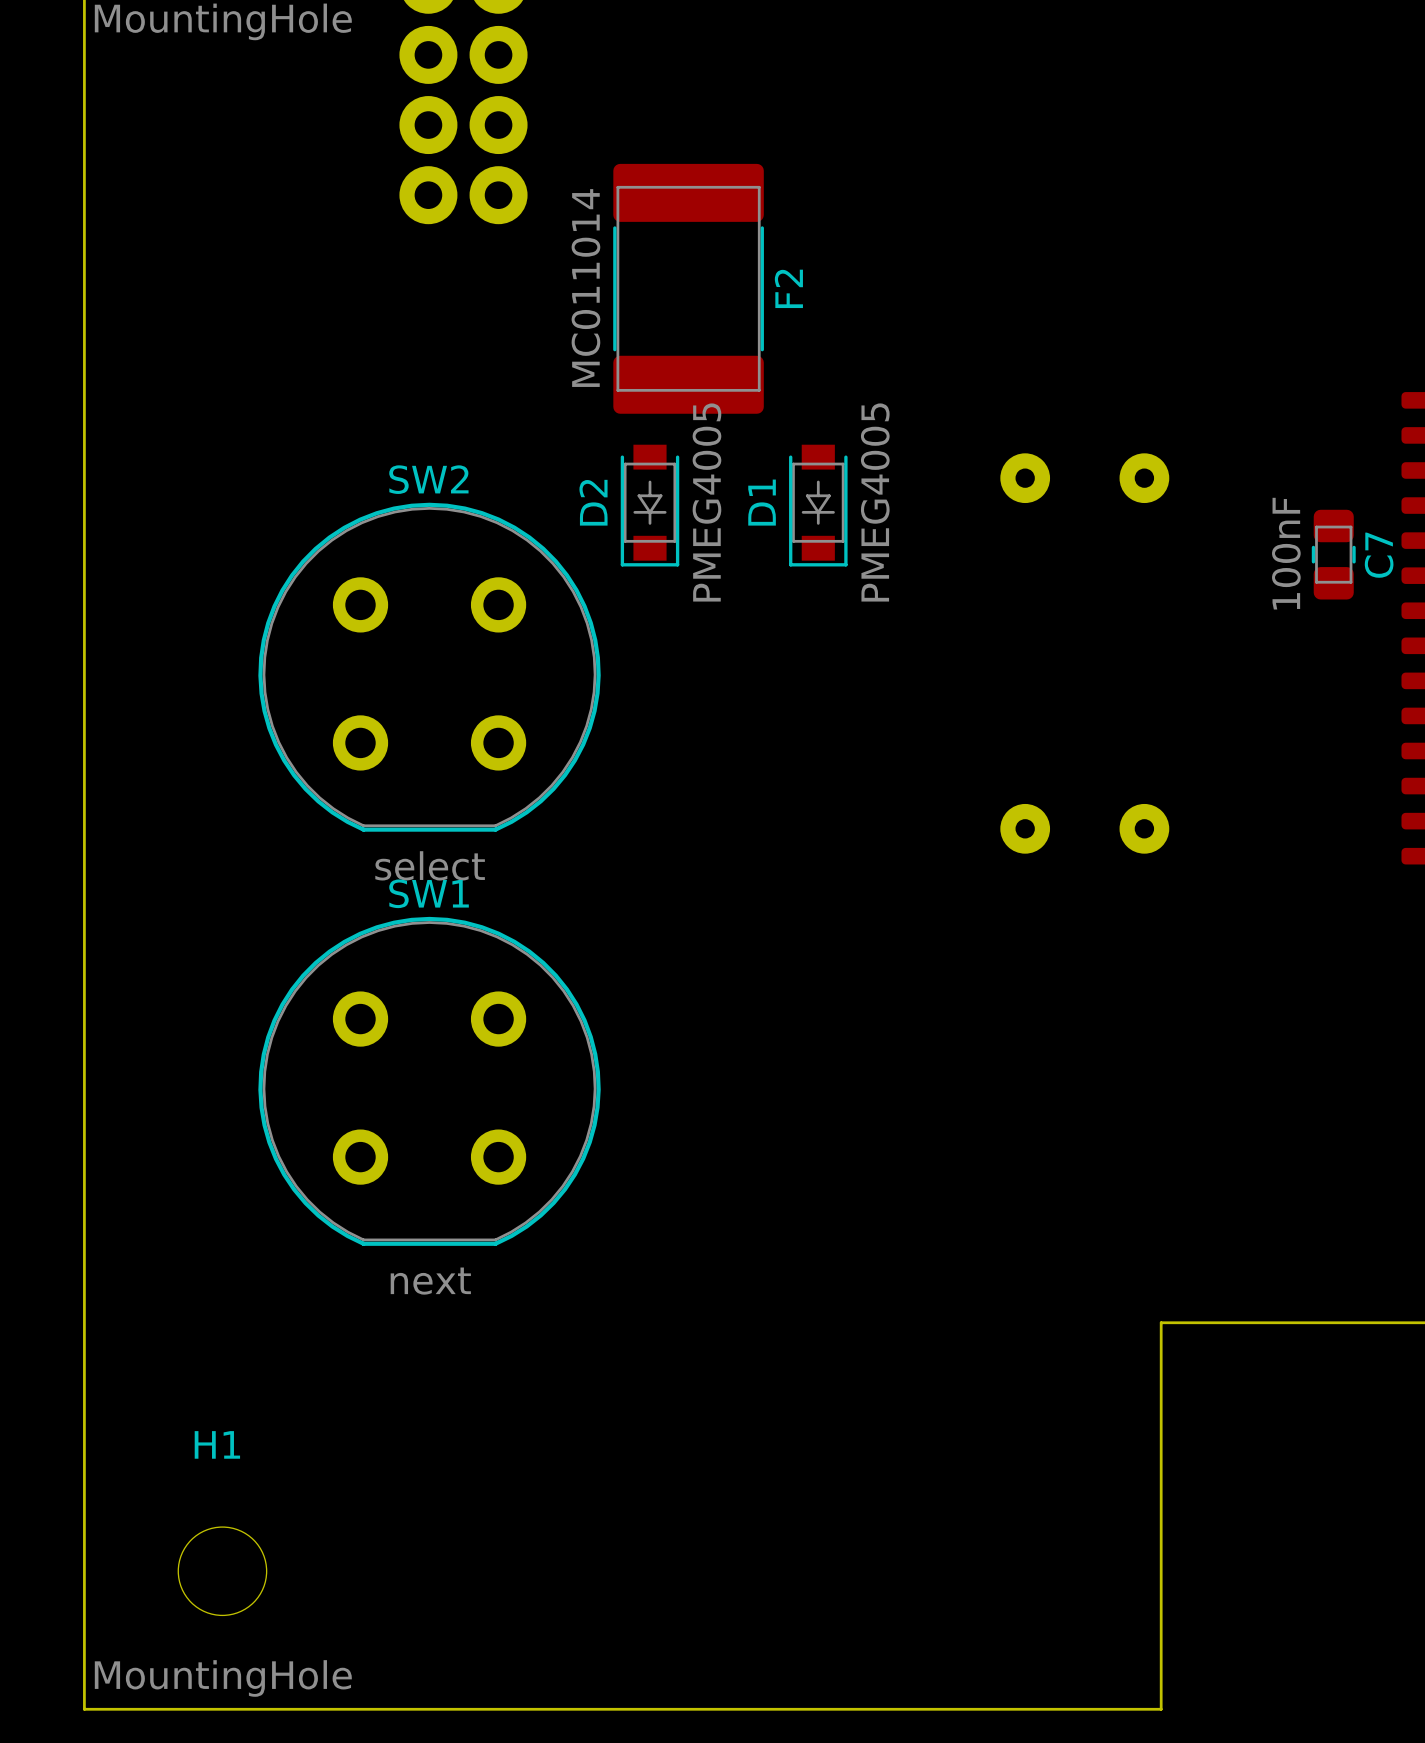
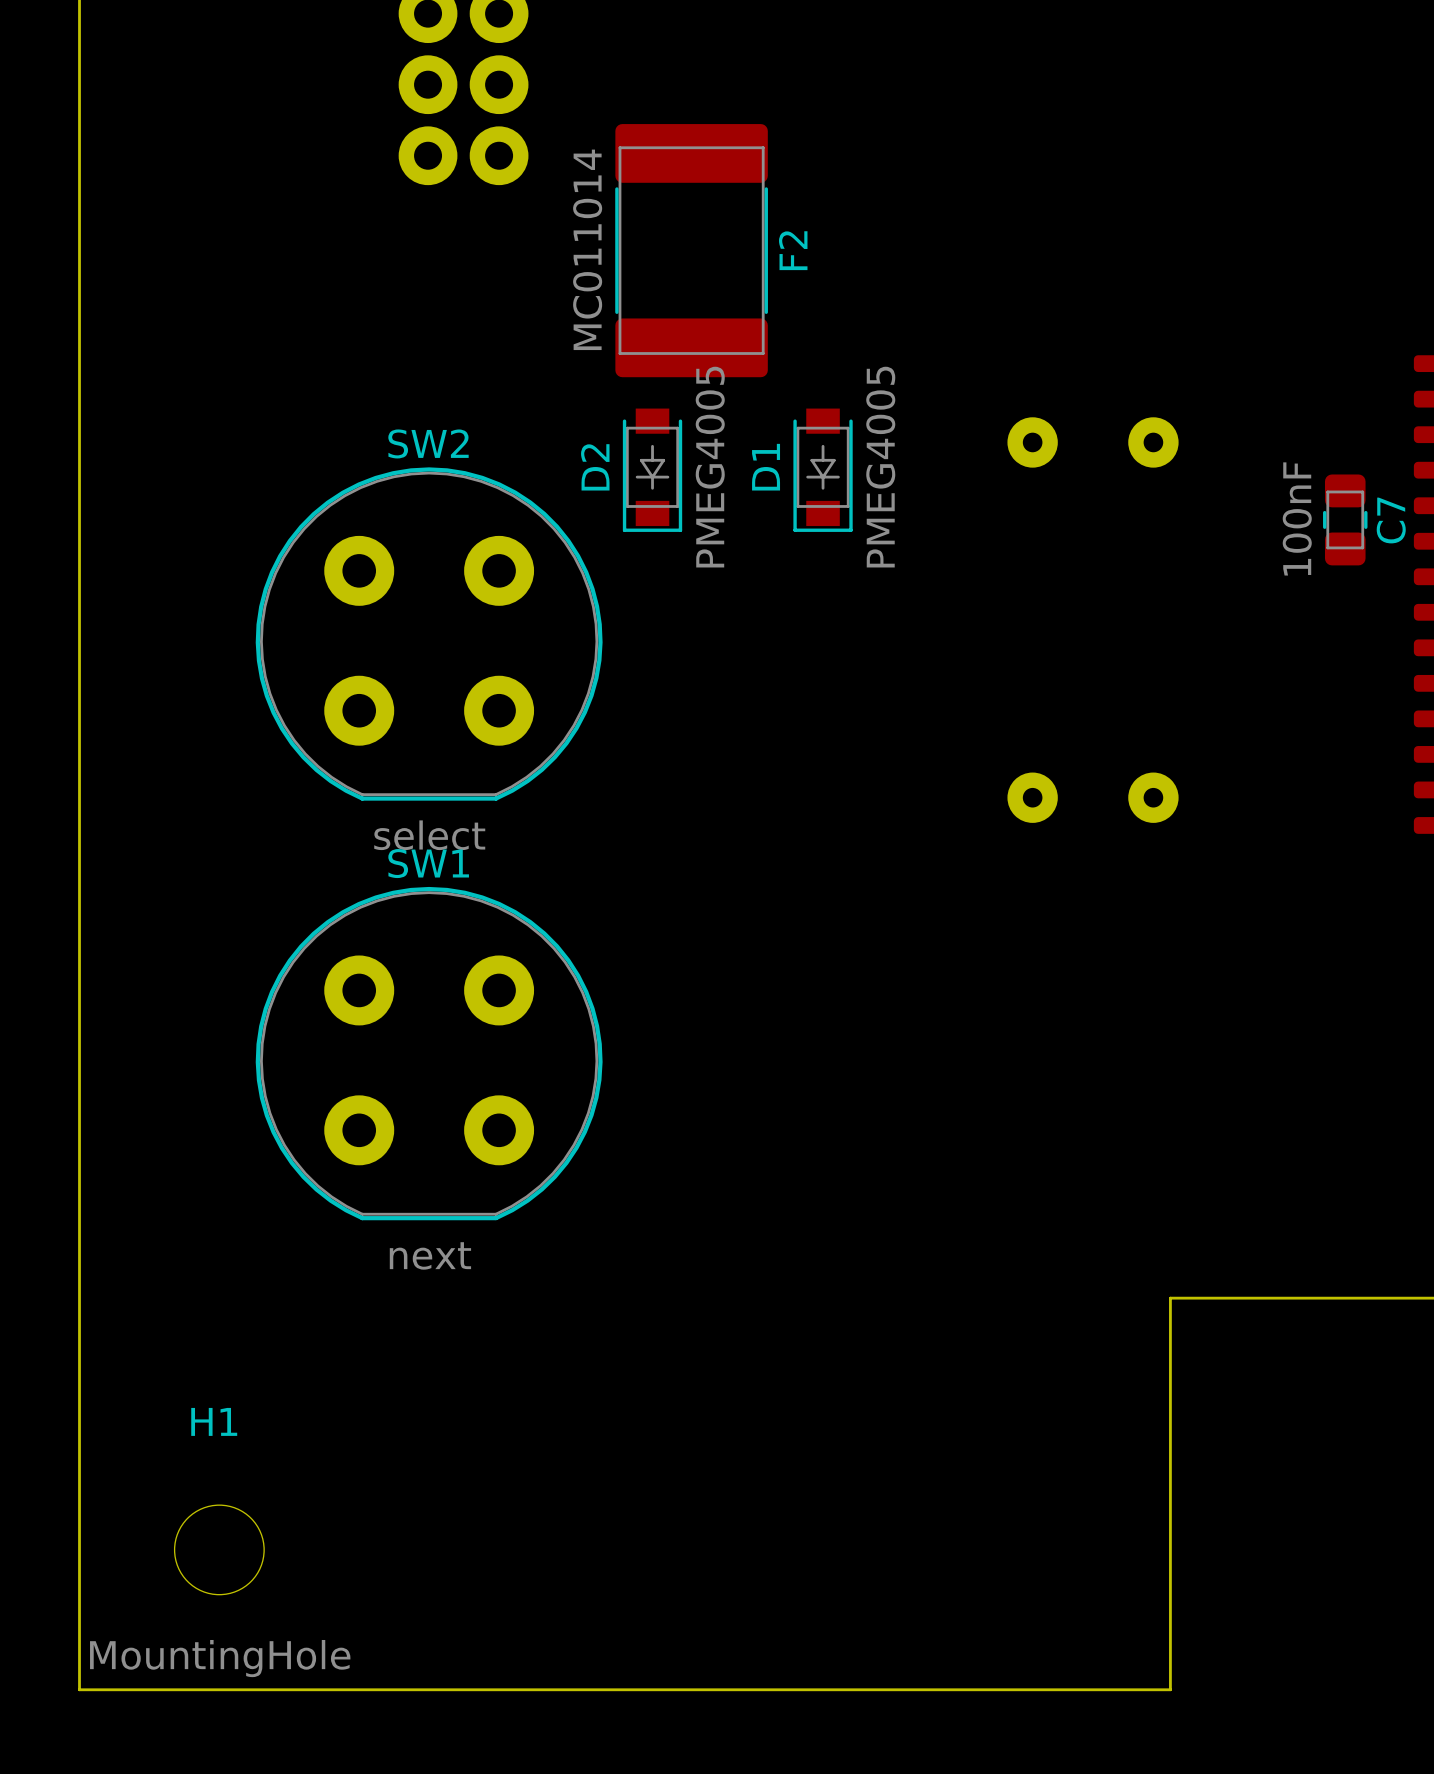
SW2 footprint: [258, 502, 601, 832] -> [255, 467, 603, 801]
SW1 footprint: [258, 916, 601, 1246] -> [255, 886, 603, 1221]

